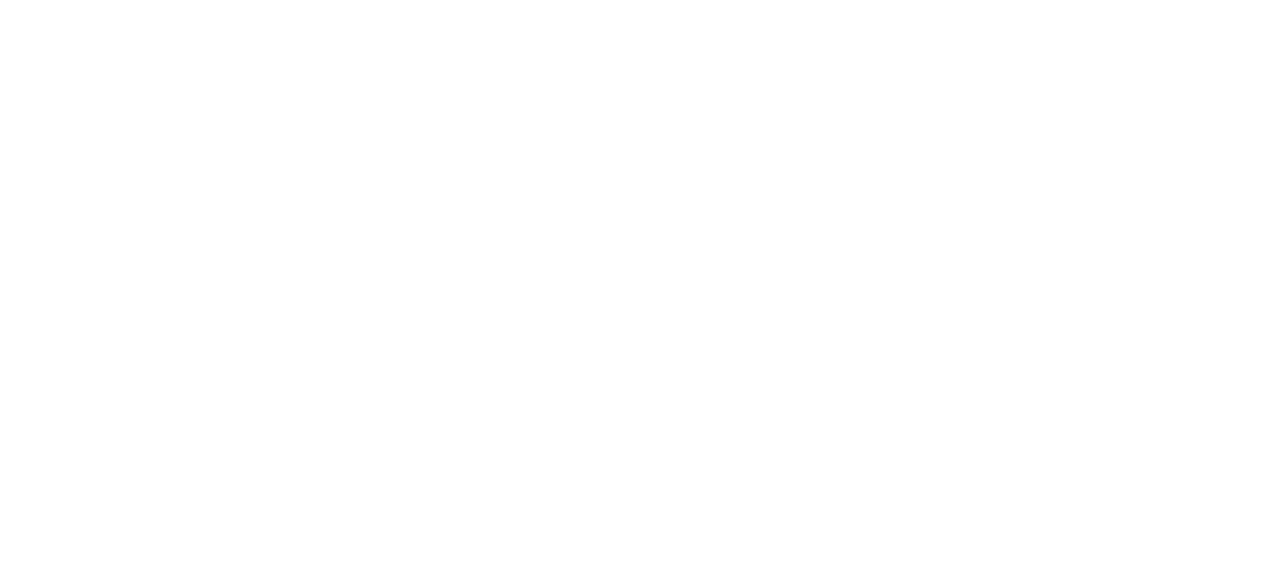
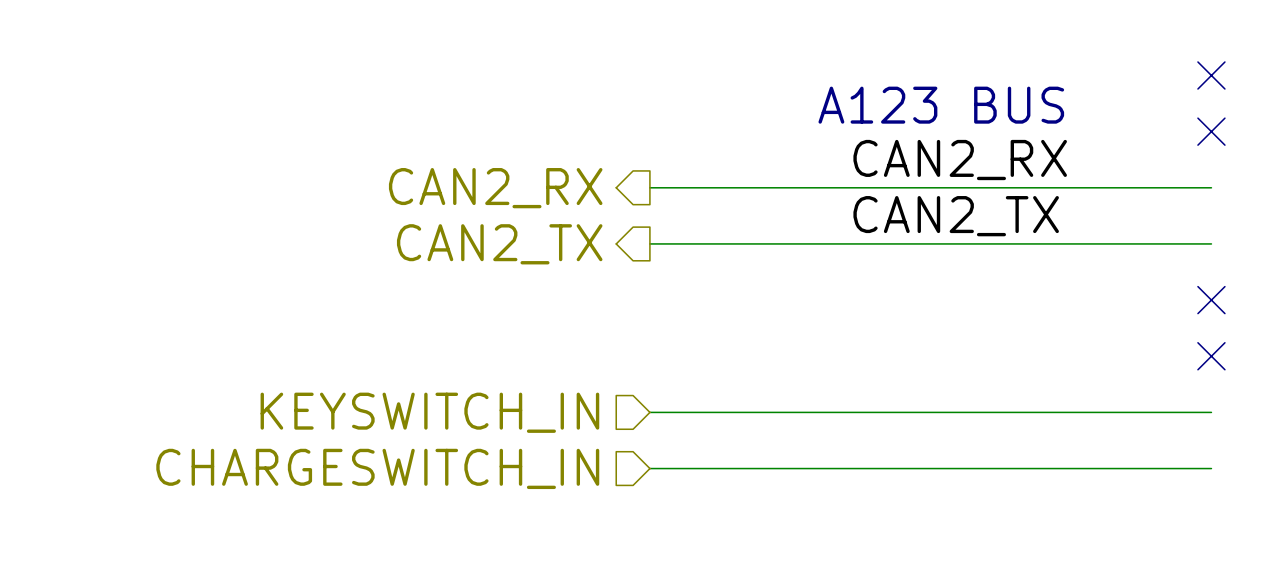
no-connect mark: none -> (1211, 75)
text: none -> A123 BUS (941, 105)
no-connect mark: none -> (1211, 131)
label: none -> CAN2_RX (960, 160)
wire: none -> (649, 187) (1211, 187)
hierarchical label: none -> CAN2_RX (495, 188)
label: none -> CAN2_TX (956, 216)
wire: none -> (649, 243) (1211, 243)
hierarchical label: none -> CAN2_TX (499, 244)
no-connect mark: none -> (1211, 300)
no-connect mark: none -> (1211, 356)
hierarchical label: none -> KEYSWITCH_IN (429, 412)
wire: none -> (649, 412) (1211, 412)
hierarchical label: none -> CHARGESWITCH_IN (377, 468)
wire: none -> (649, 468) (1211, 468)

